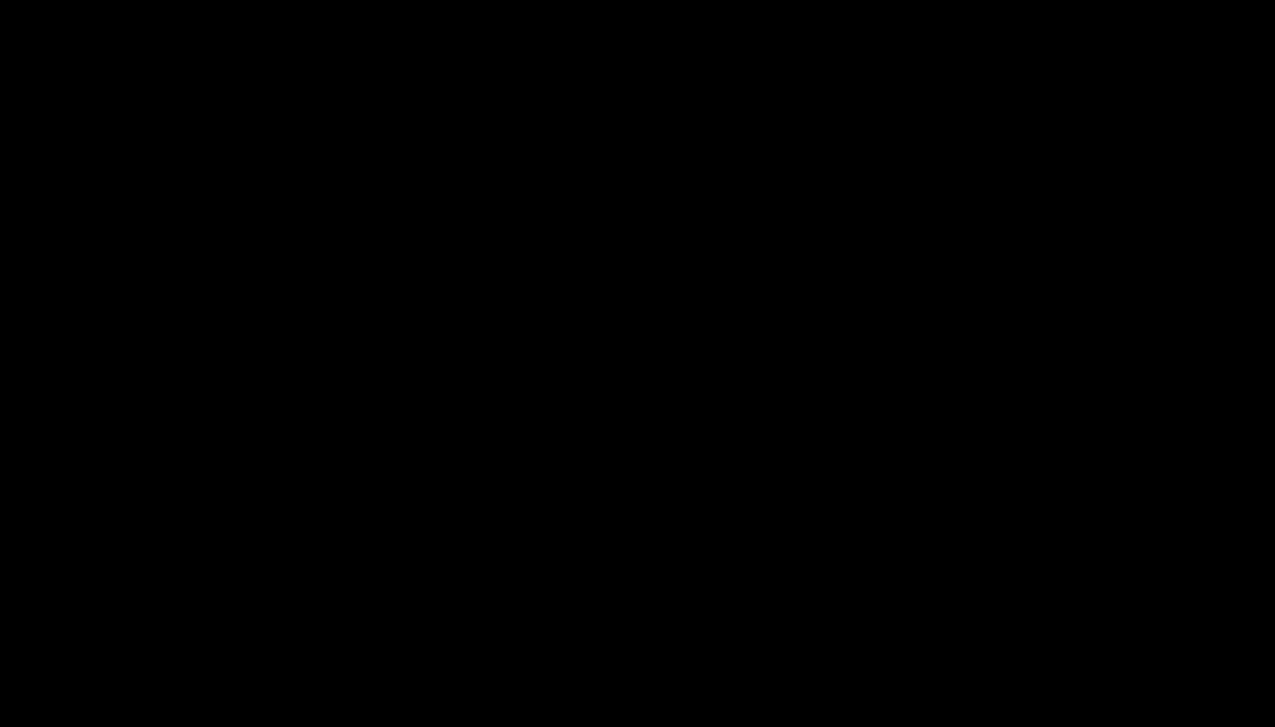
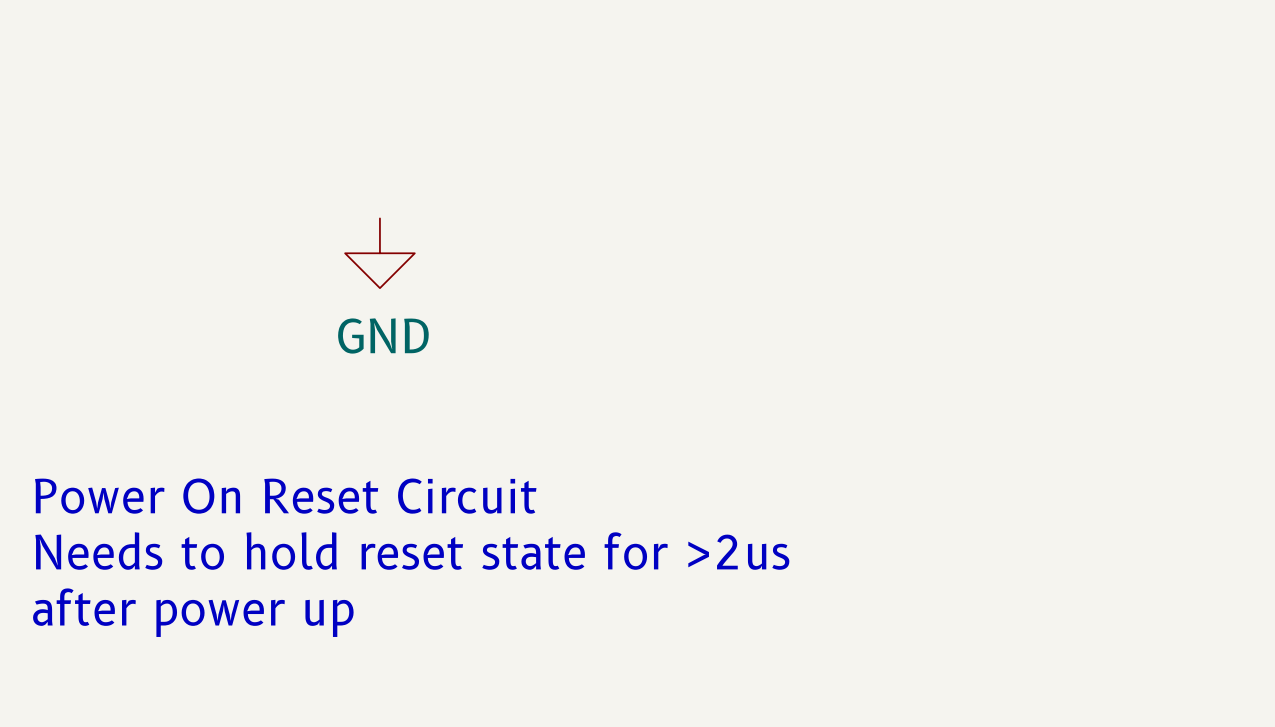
power symbol: none -> GND (379, 253)
text: none -> Power On Reset Circuit (285, 496)
text: none -> Needs to hold reset state for >2us (412, 551)
text: none -> after power up (193, 612)

